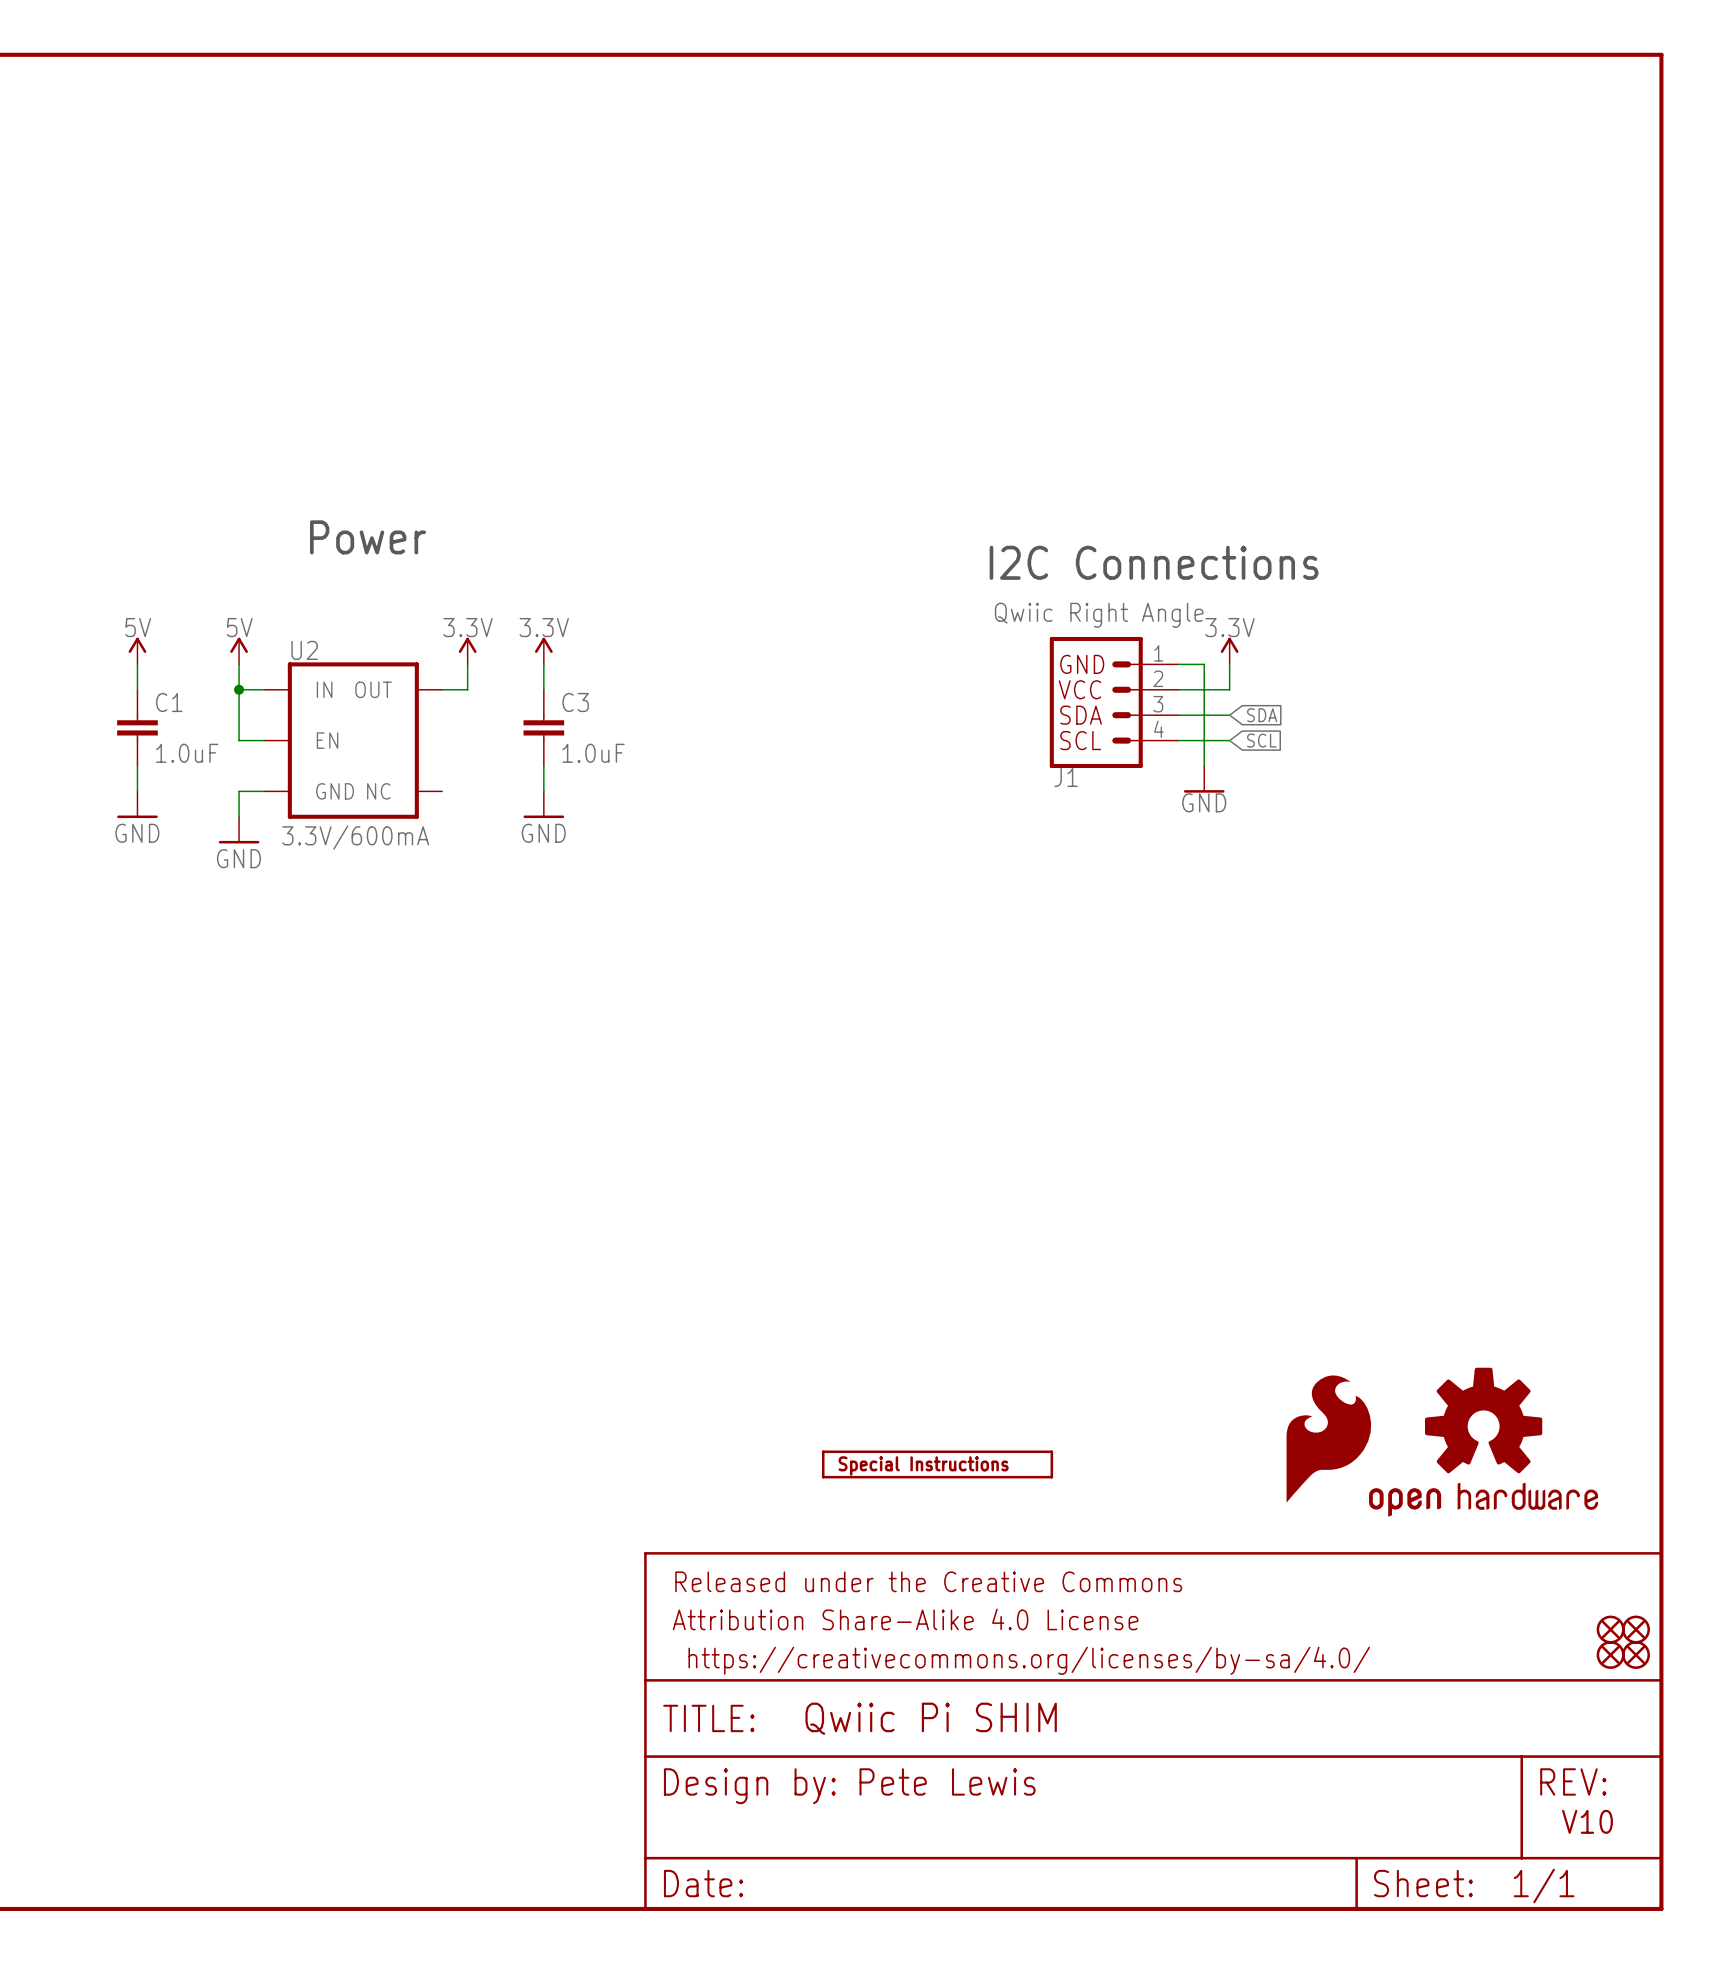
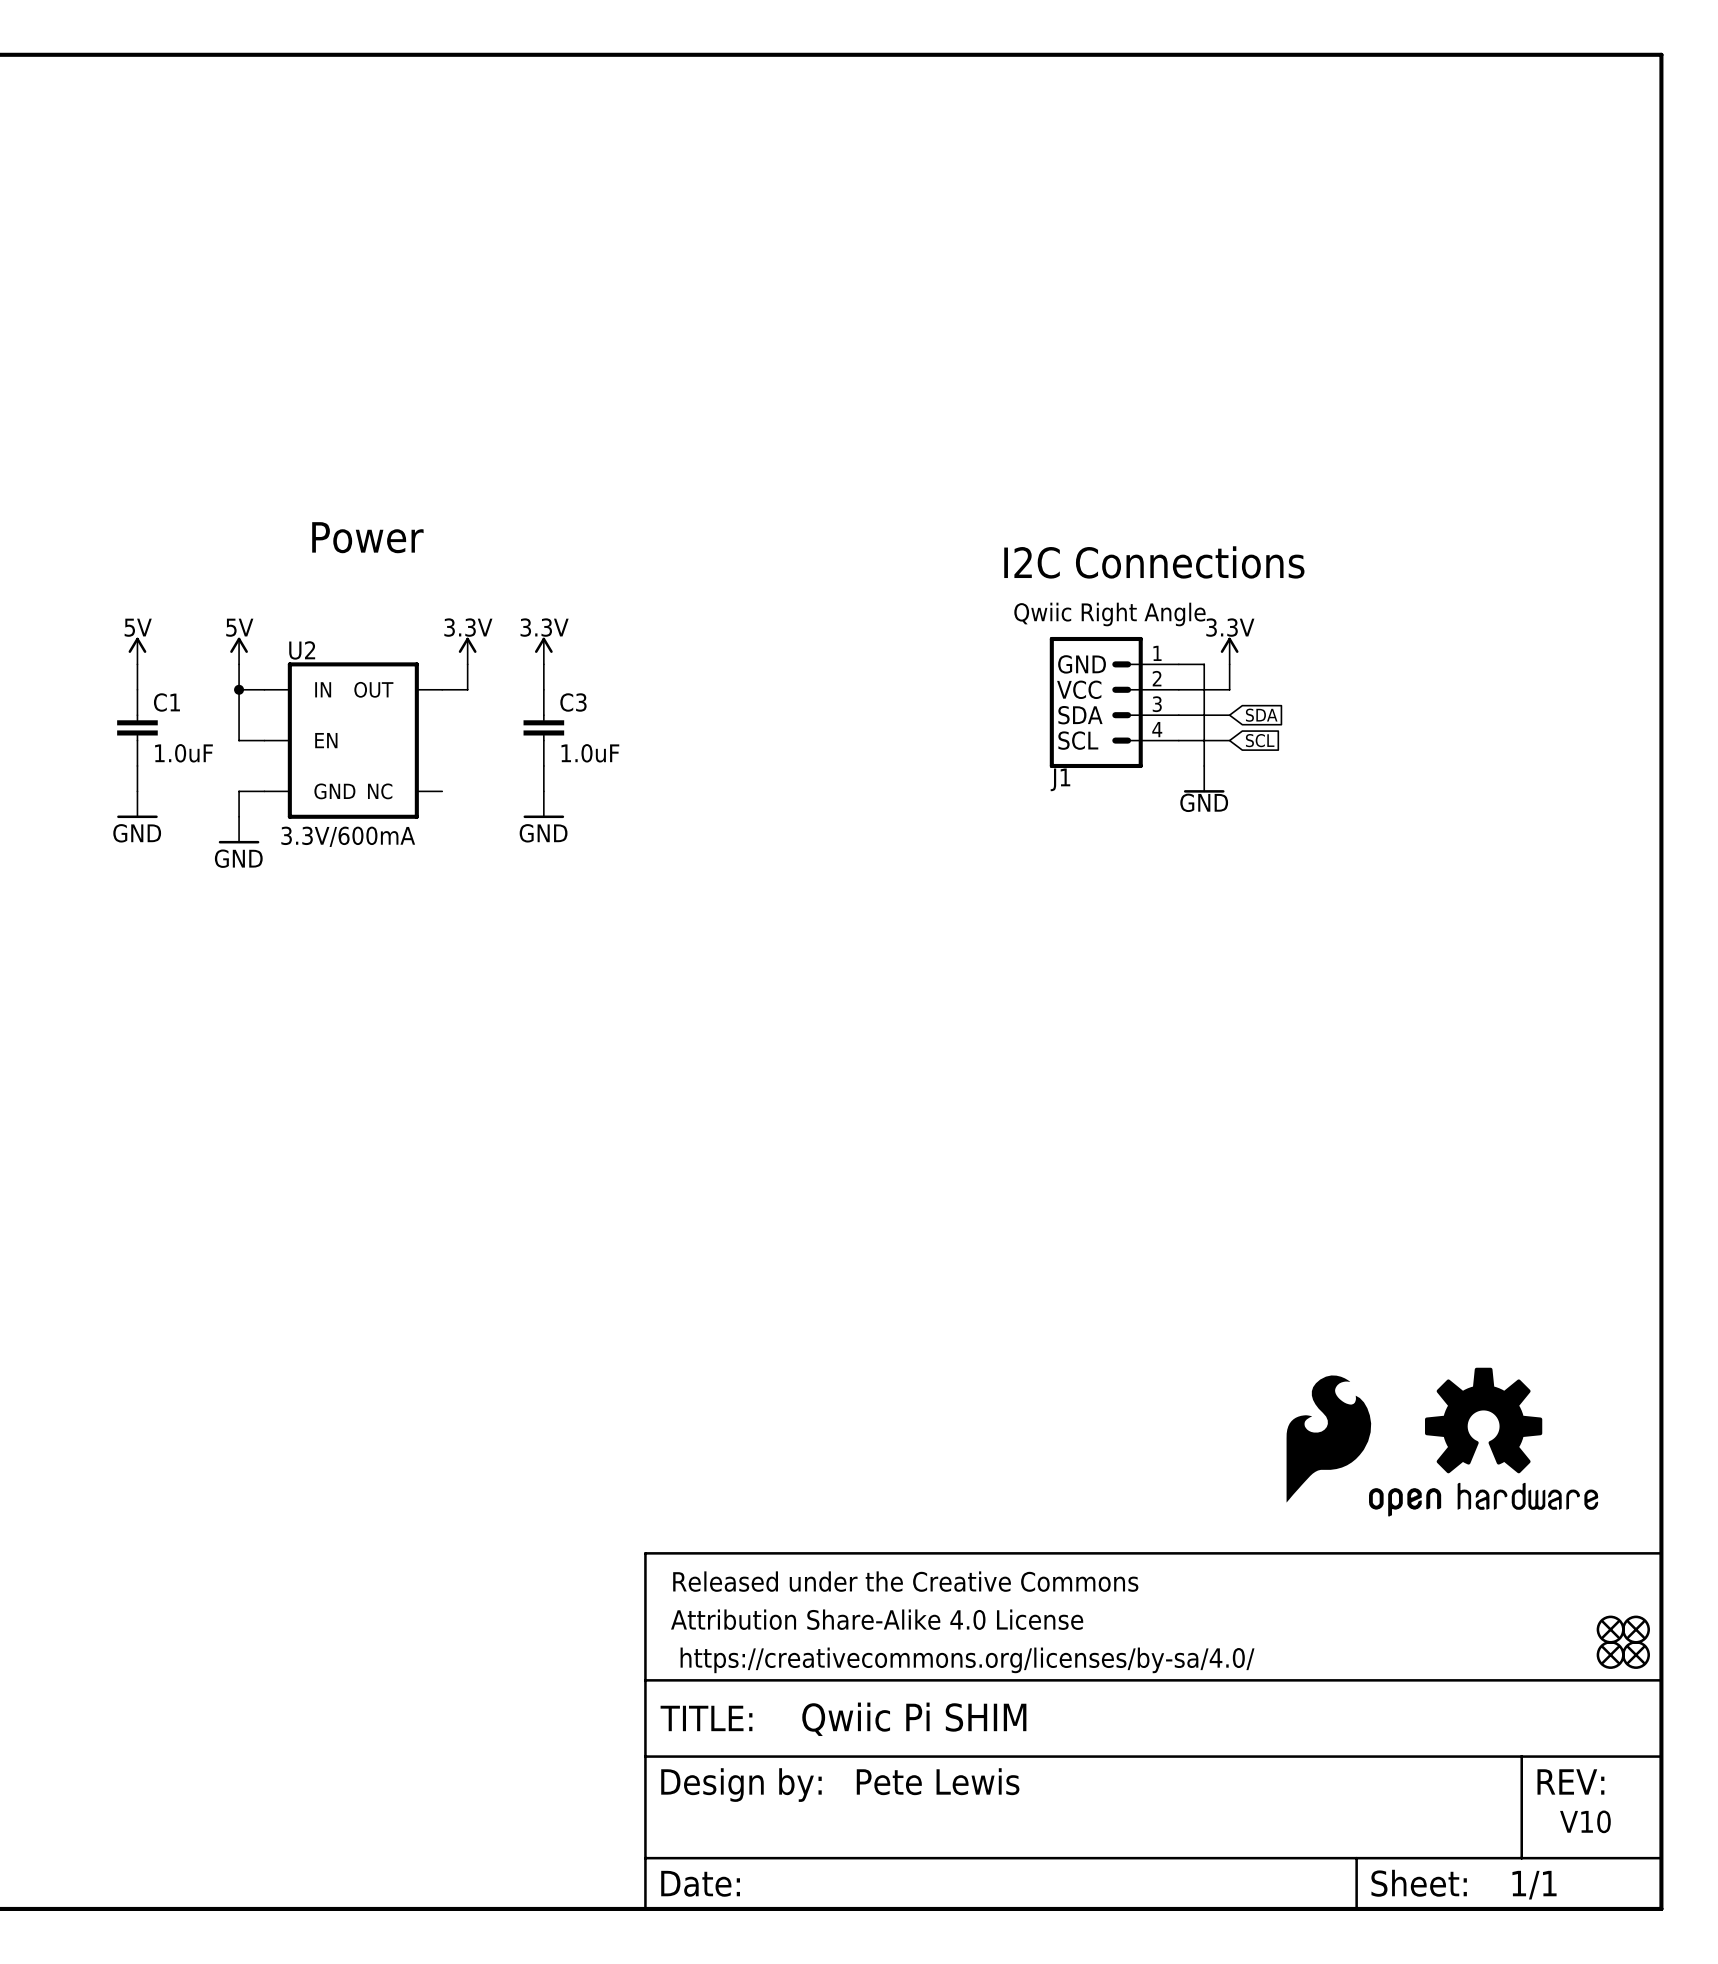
part: (937, 1464) -> none

